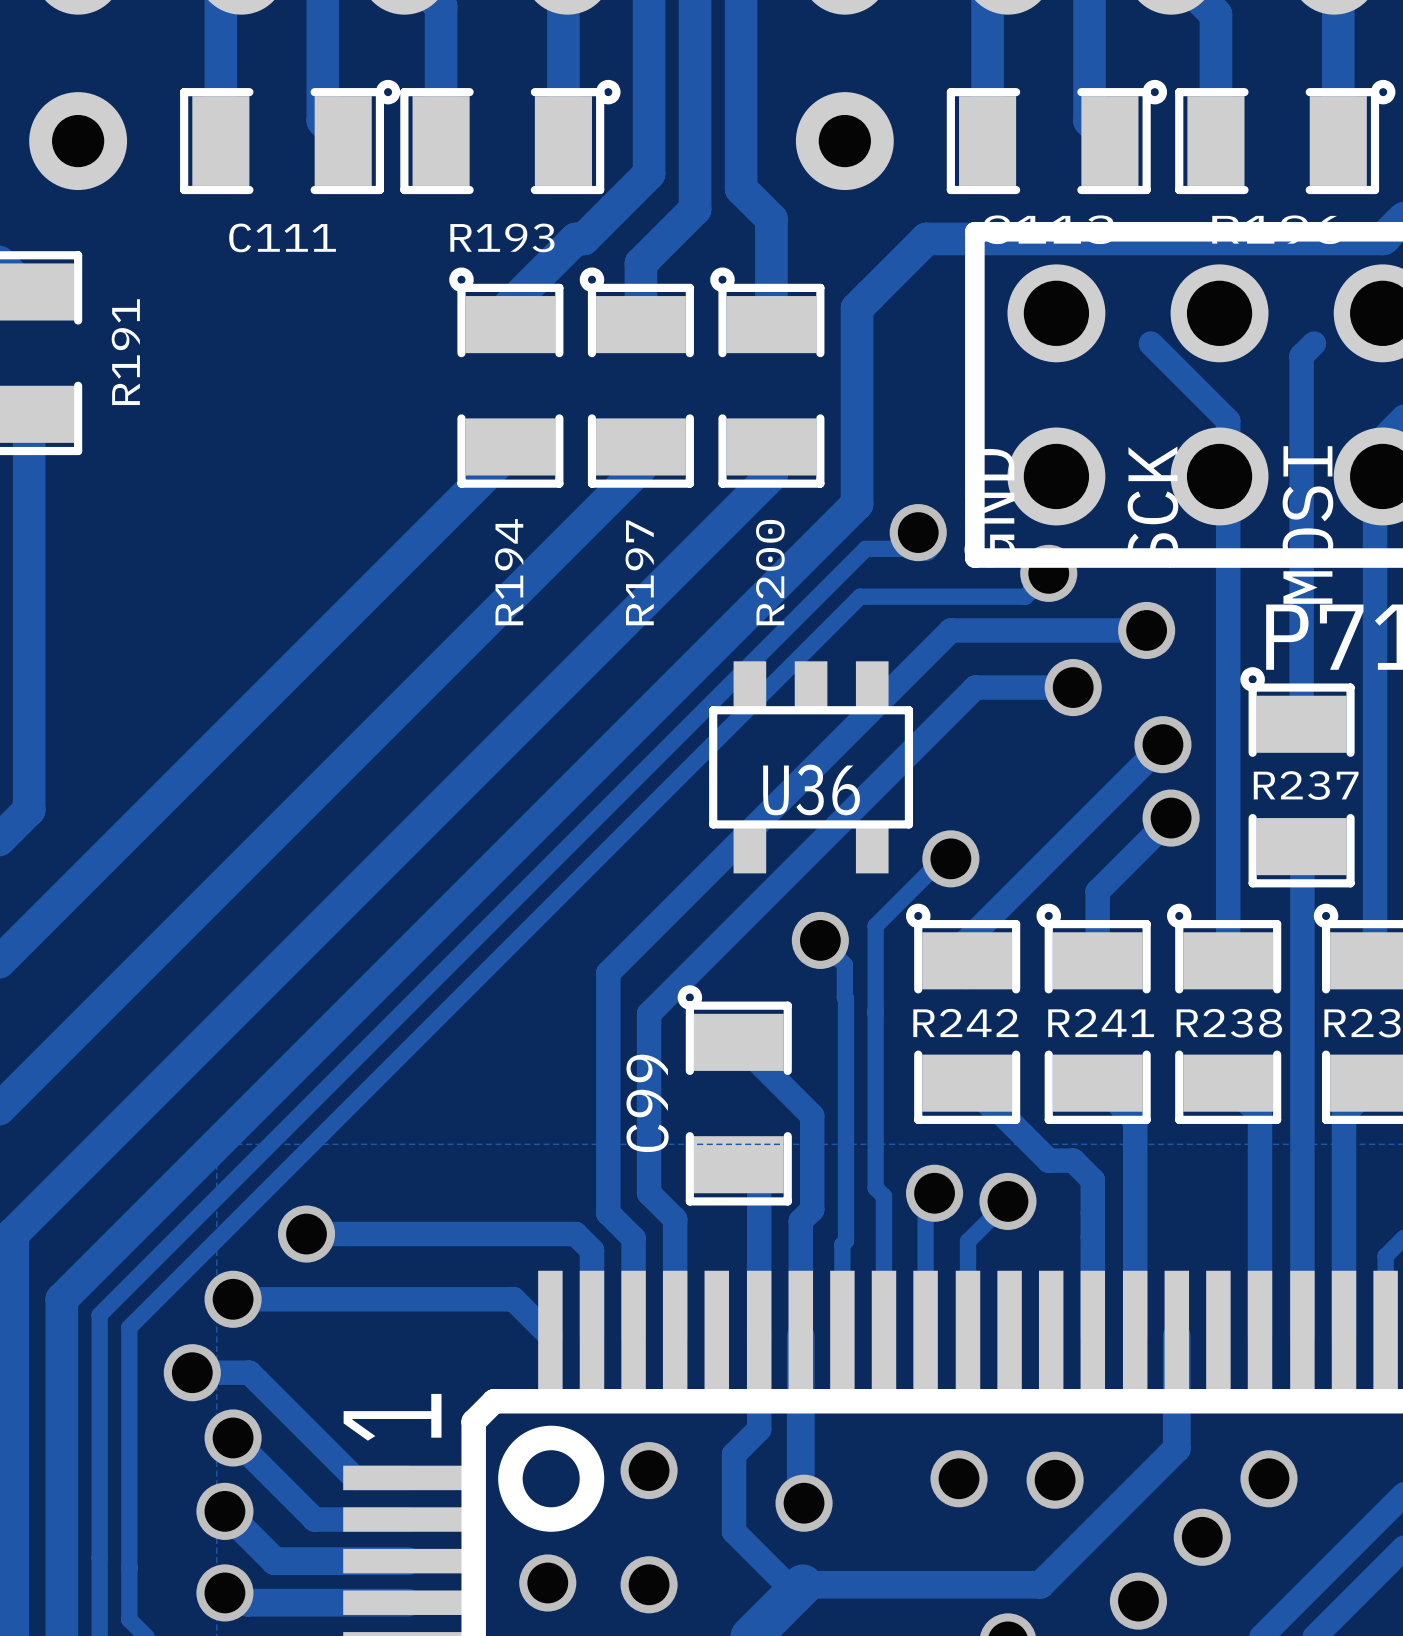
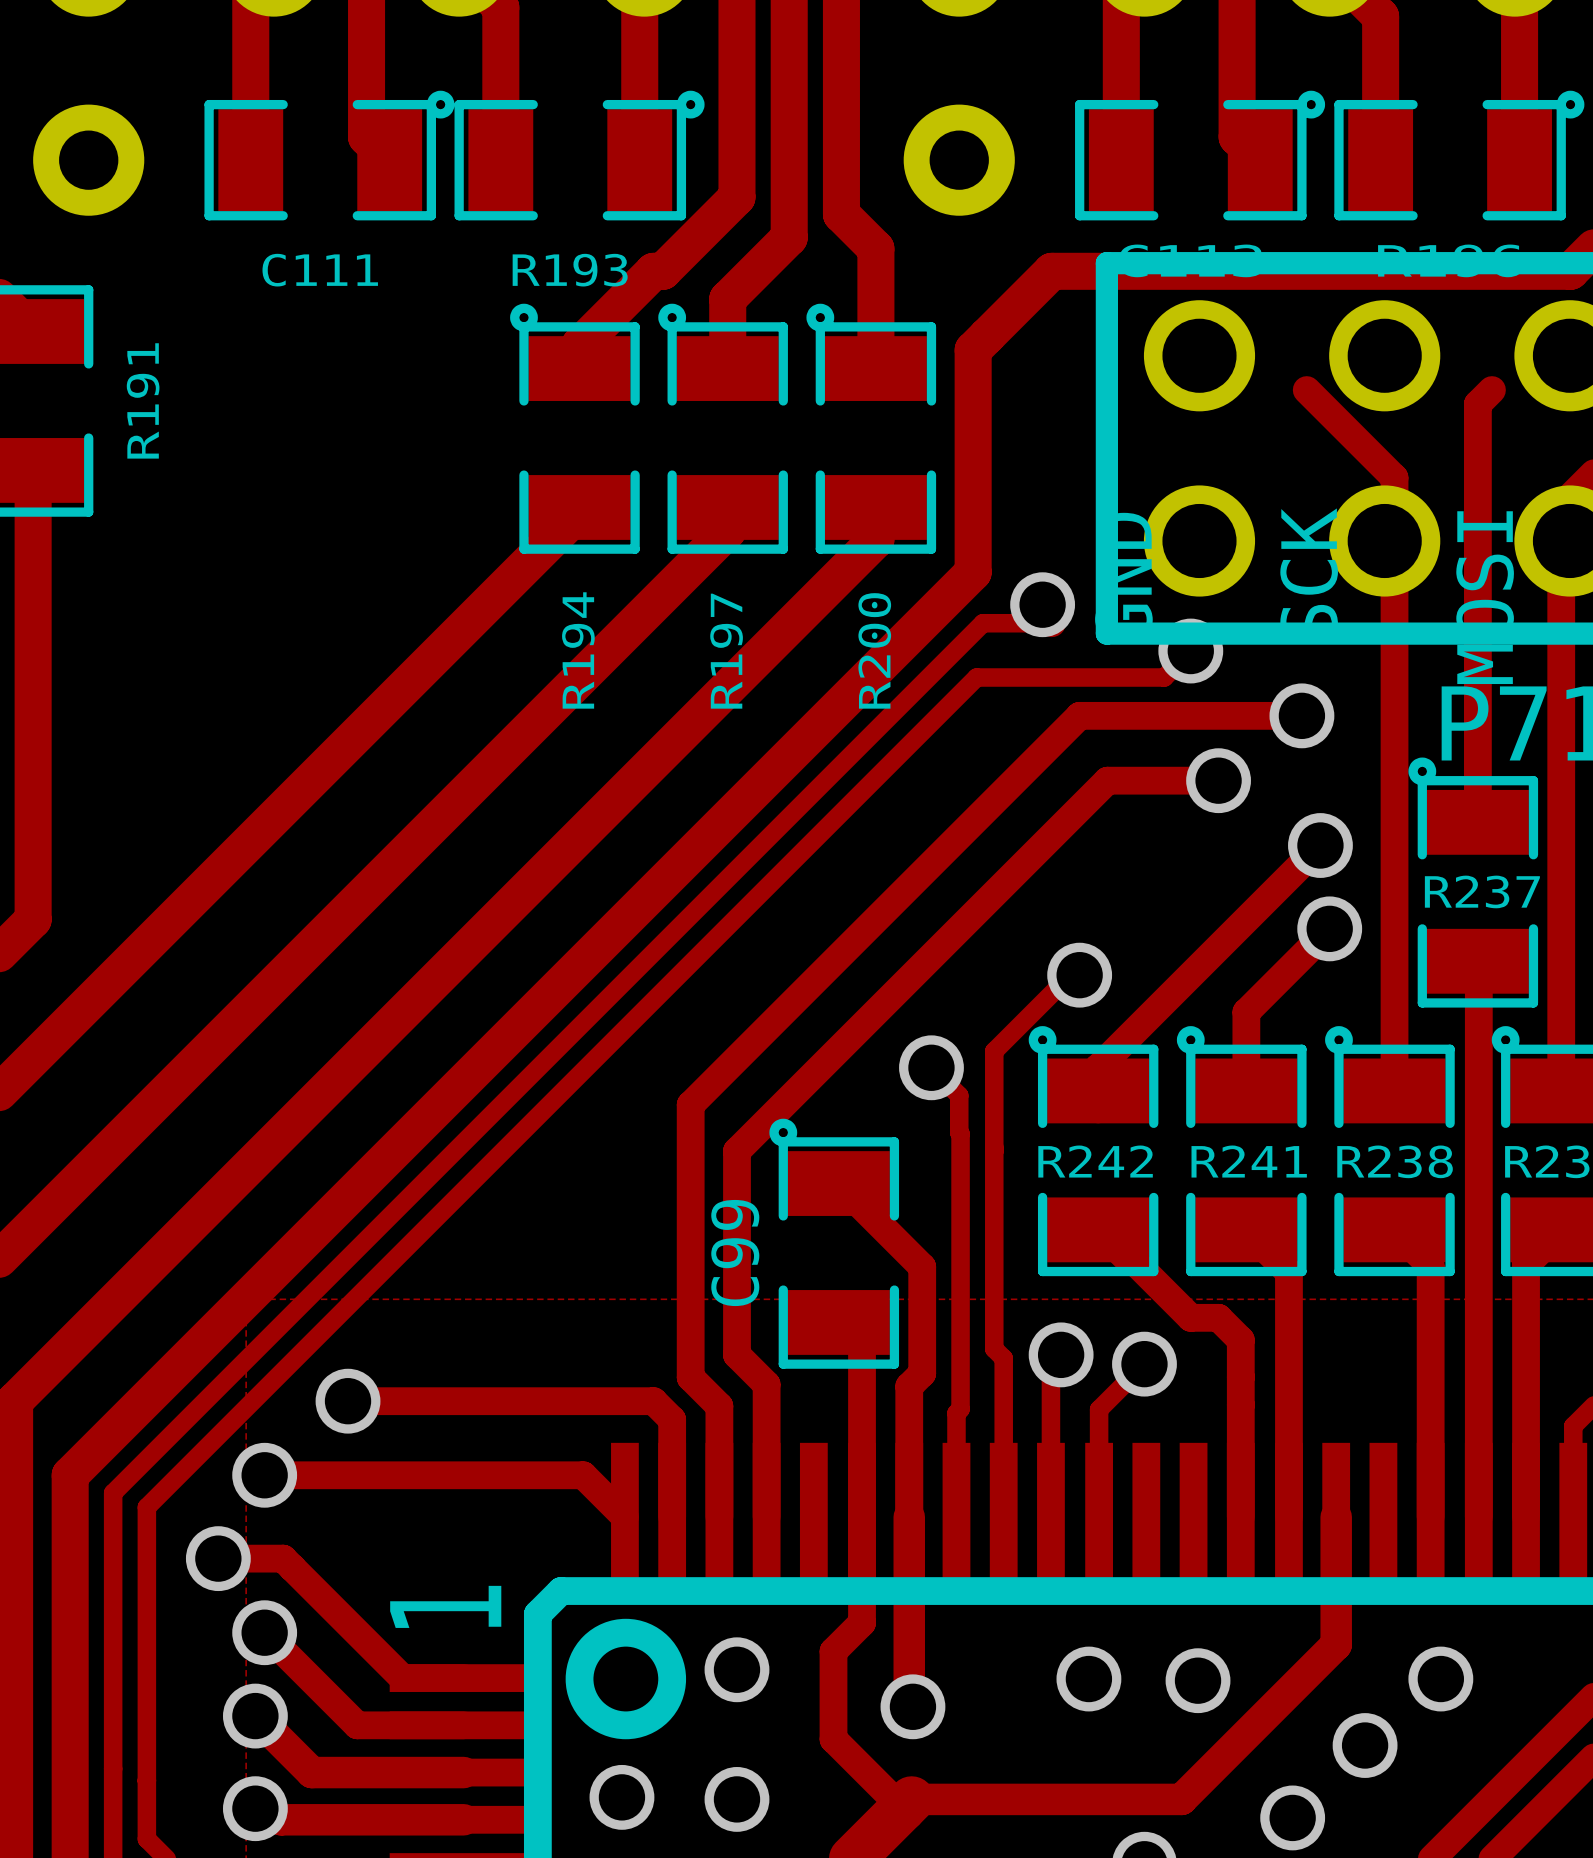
U36: (811, 767) -> none

